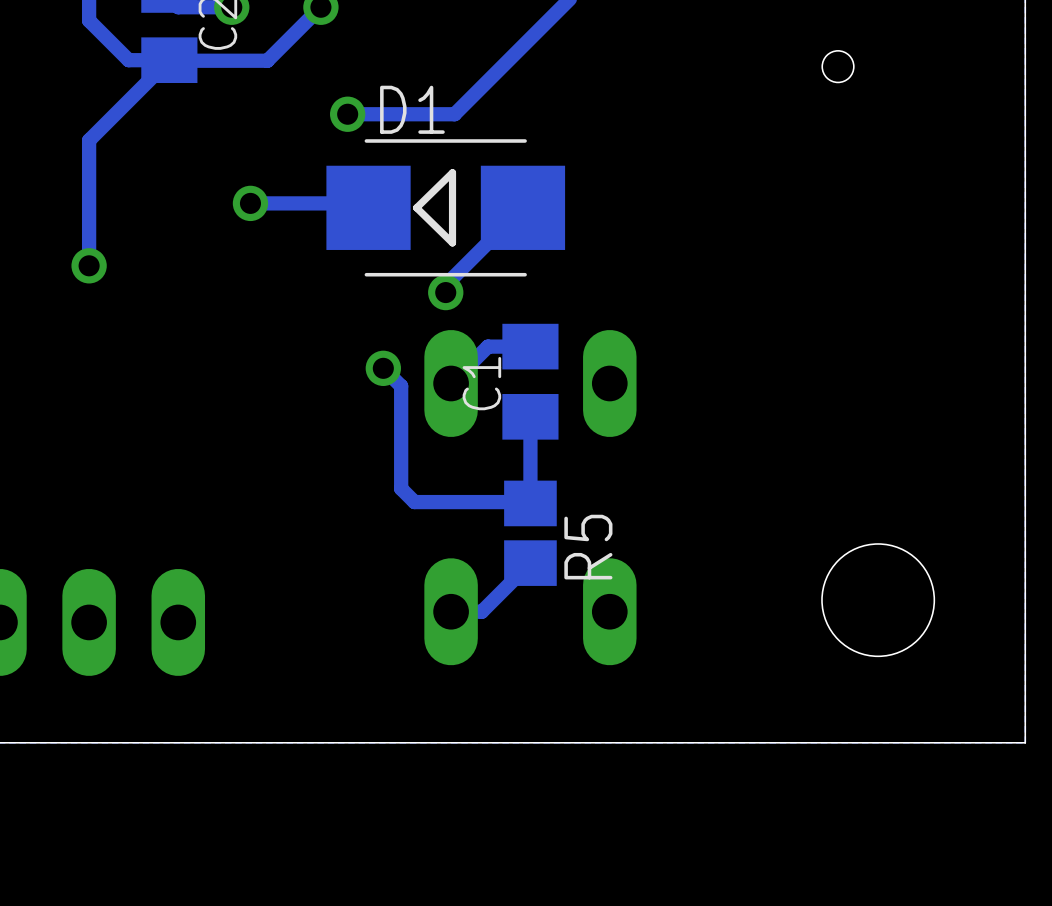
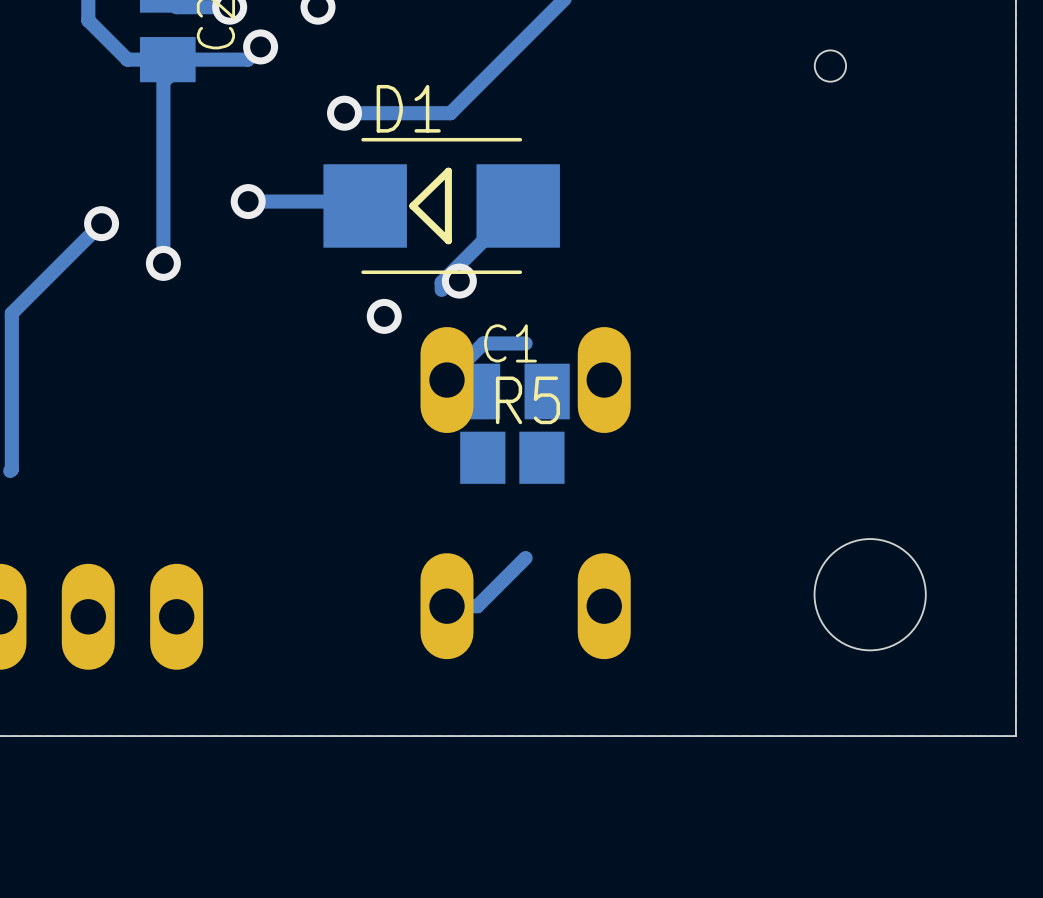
track: (320, 7) (267, 60) (169, 60) -> none
track: none -> (260, 46) (247, 59) (167, 59) (167, 77)
via: none -> (260, 46)
track: (164, 64) (89, 140) (89, 265) -> (163, 64) (163, 263)
track: none -> (101, 223) (11, 313) (11, 469) (10, 471)
via: none -> (101, 223)
via: (89, 265) -> none
via: none -> (163, 263)
via position: (445, 292) -> (459, 281)
via: none -> (384, 316)
track: (383, 368) (401, 386) (401, 488) (414, 502) (530, 502) -> none
via: (383, 368) -> none
C1 rotation: 0° (530, 381) -> 90° clockwise (512, 391)
track: (530, 416) (530, 503) -> none
R5 rotation: 0° (530, 533) -> 90° clockwise (512, 457)
R5 position: (530, 533) -> (512, 457)
R5 name position: R5 (588, 547) -> R5 (527, 400)

